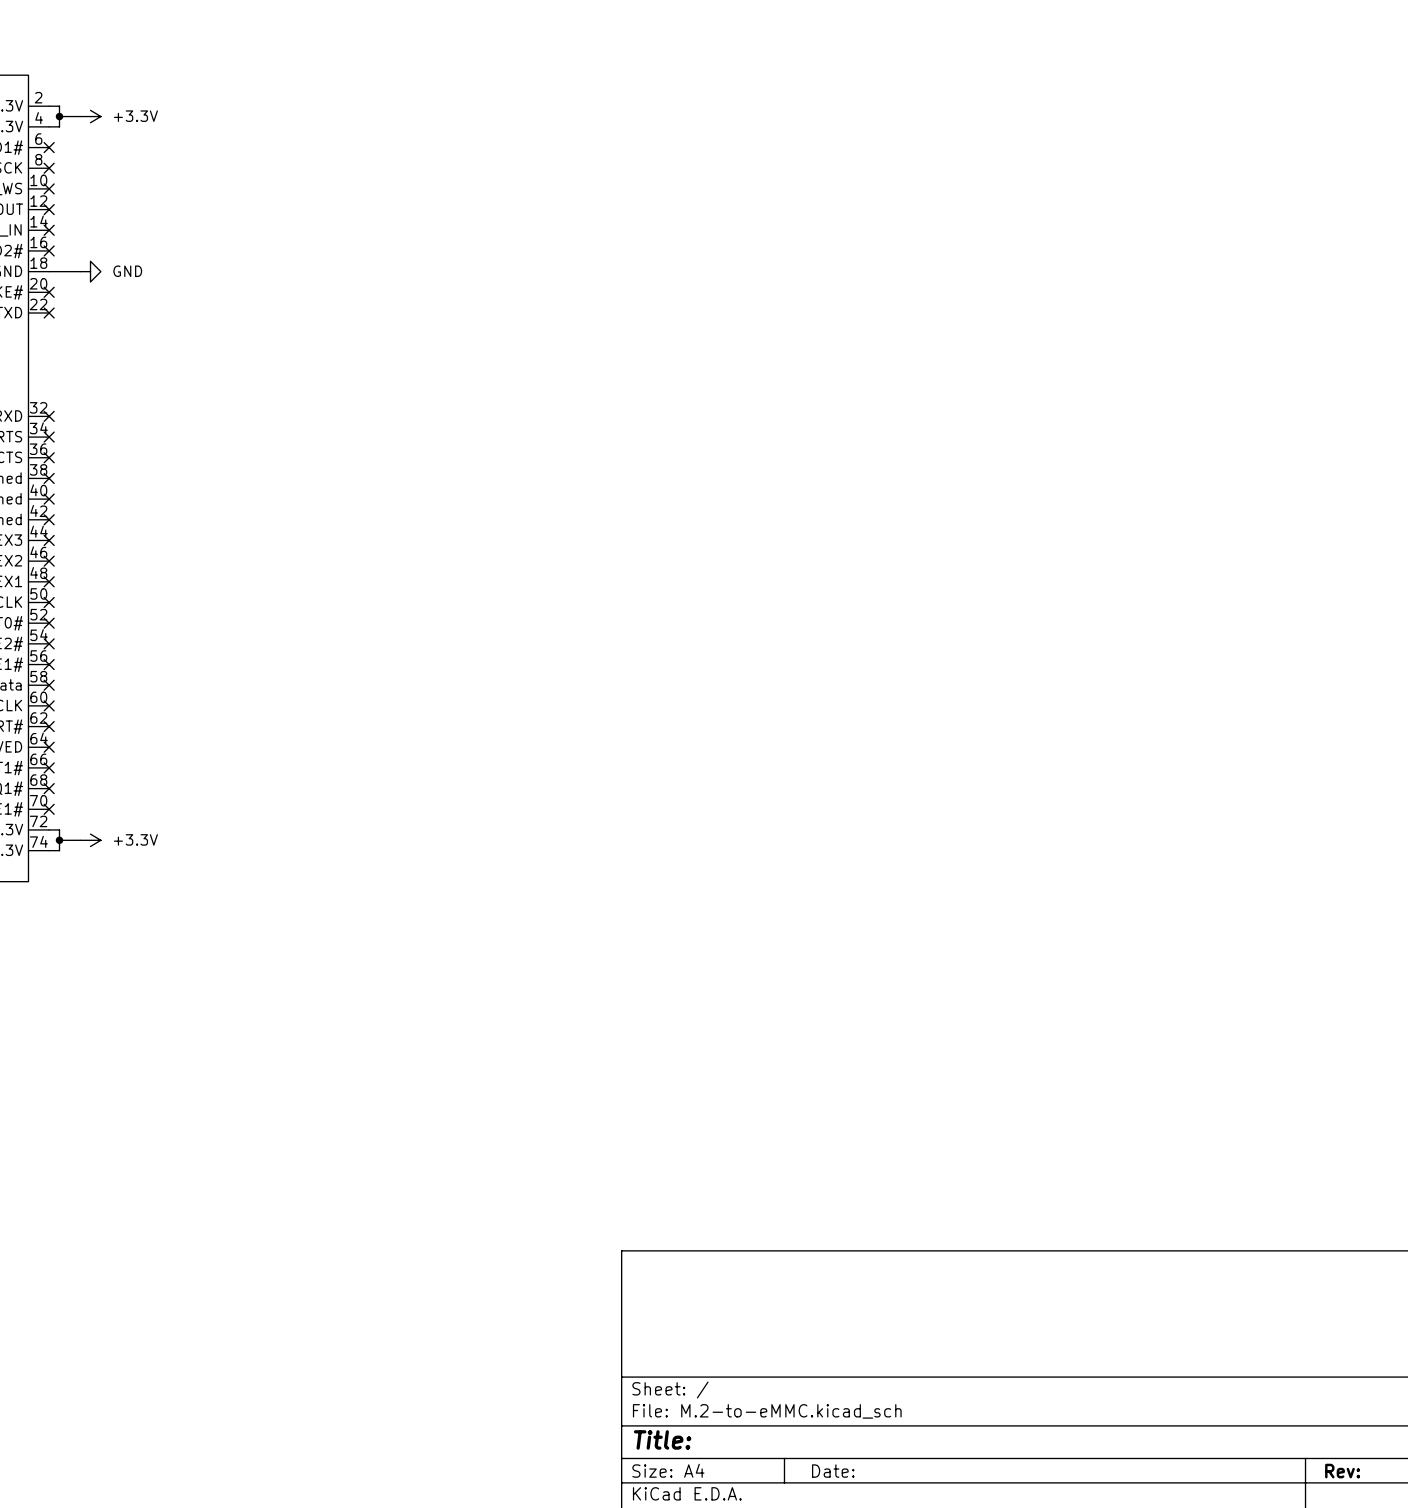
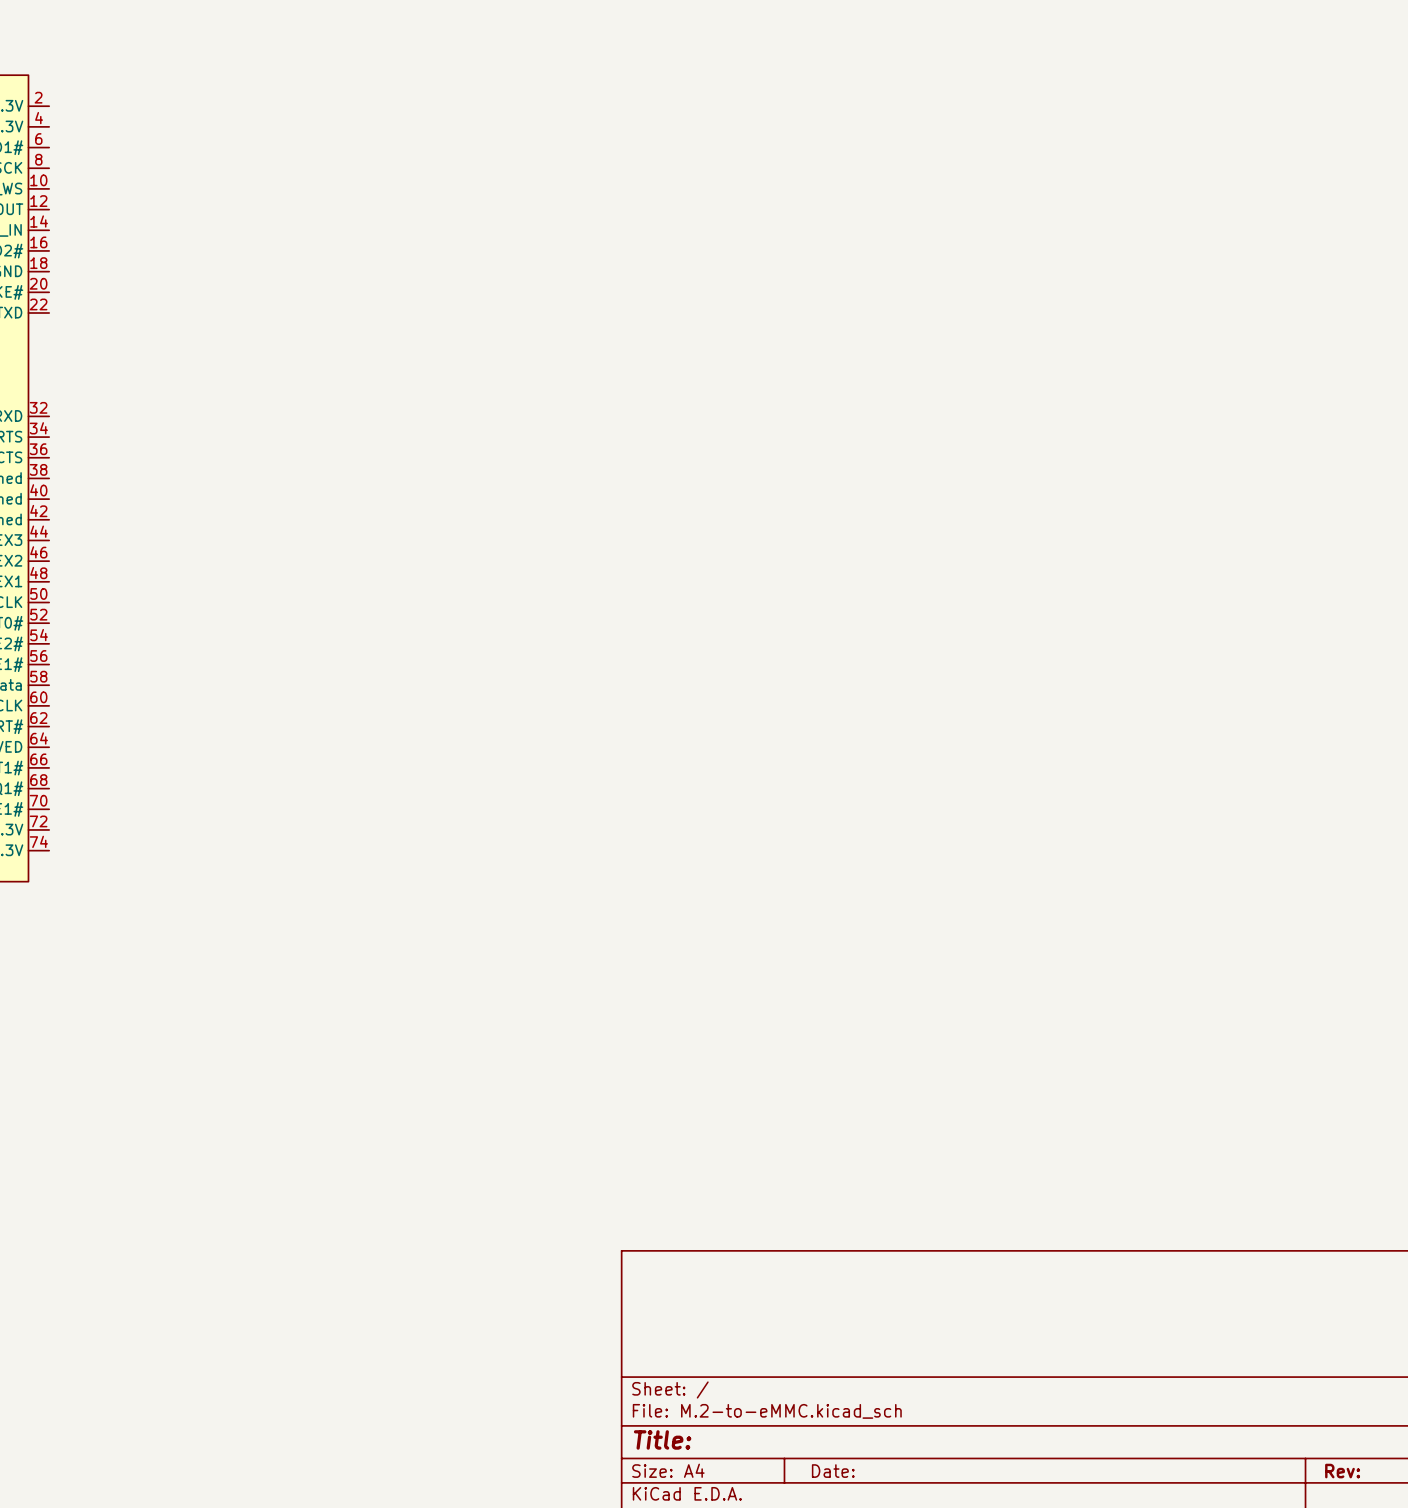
wire: (49, 106) (59, 106) (59, 126) (49, 126) -> none
wire: (59, 116) (80, 116) -> none
junction: (59, 116) -> none
power symbol: +3.3V (90, 116) -> none
no-connect mark: (49, 147) -> none
no-connect mark: (49, 168) -> none
no-connect mark: (49, 188) -> none
no-connect mark: (49, 209) -> none
no-connect mark: (49, 230) -> none
no-connect mark: (49, 250) -> none
wire: (49, 271) (80, 271) -> none
power symbol: GND (90, 271) -> none
no-connect mark: (49, 292) -> none
no-connect mark: (49, 313) -> none
no-connect mark: (49, 416) -> none
no-connect mark: (49, 437) -> none
no-connect mark: (49, 457) -> none
no-connect mark: (49, 478) -> none
no-connect mark: (49, 499) -> none
no-connect mark: (49, 519) -> none
no-connect mark: (49, 540) -> none
no-connect mark: (49, 561) -> none
no-connect mark: (49, 581) -> none
no-connect mark: (49, 602) -> none
no-connect mark: (49, 623) -> none
no-connect mark: (49, 643) -> none
no-connect mark: (49, 664) -> none
no-connect mark: (49, 685) -> none
no-connect mark: (49, 705) -> none
no-connect mark: (49, 726) -> none
no-connect mark: (49, 747) -> none
no-connect mark: (49, 767) -> none
no-connect mark: (49, 788) -> none
no-connect mark: (49, 809) -> none
wire: (49, 829) (59, 829) (59, 850) (49, 850) -> none
wire: (59, 840) (80, 840) -> none
junction: (59, 840) -> none
power symbol: +3.3V (90, 840) -> none

